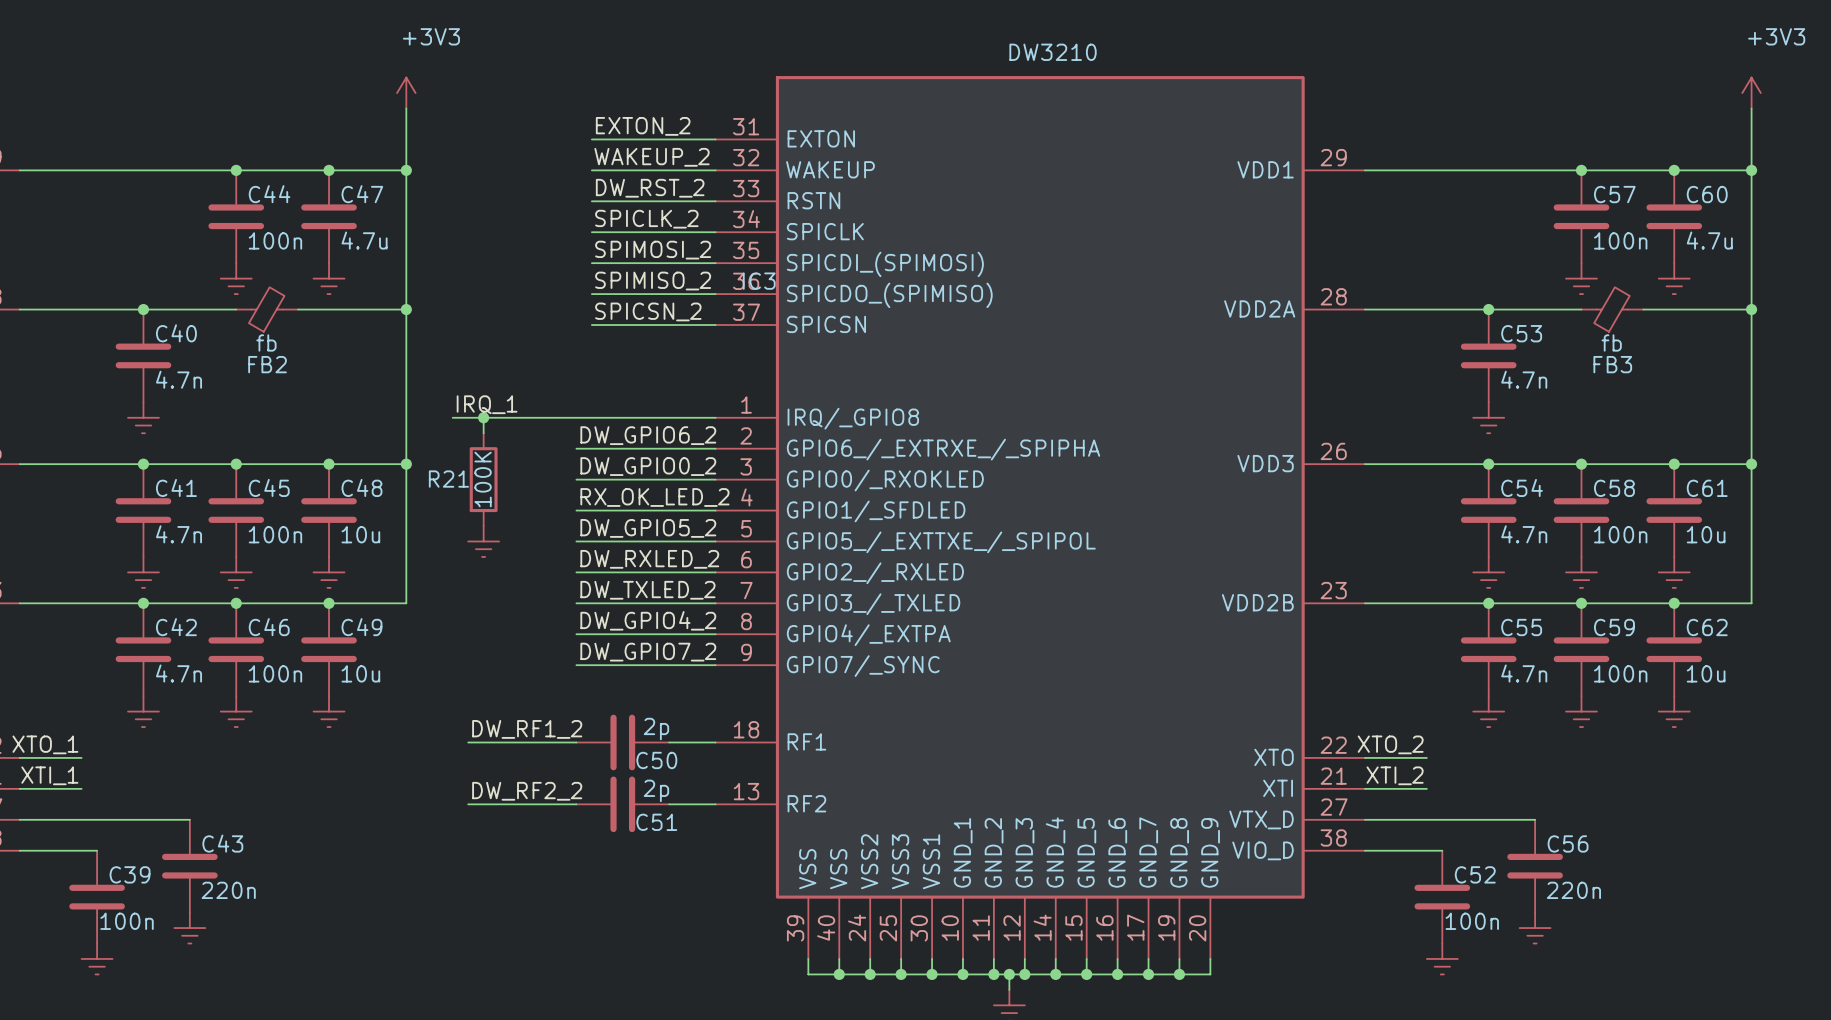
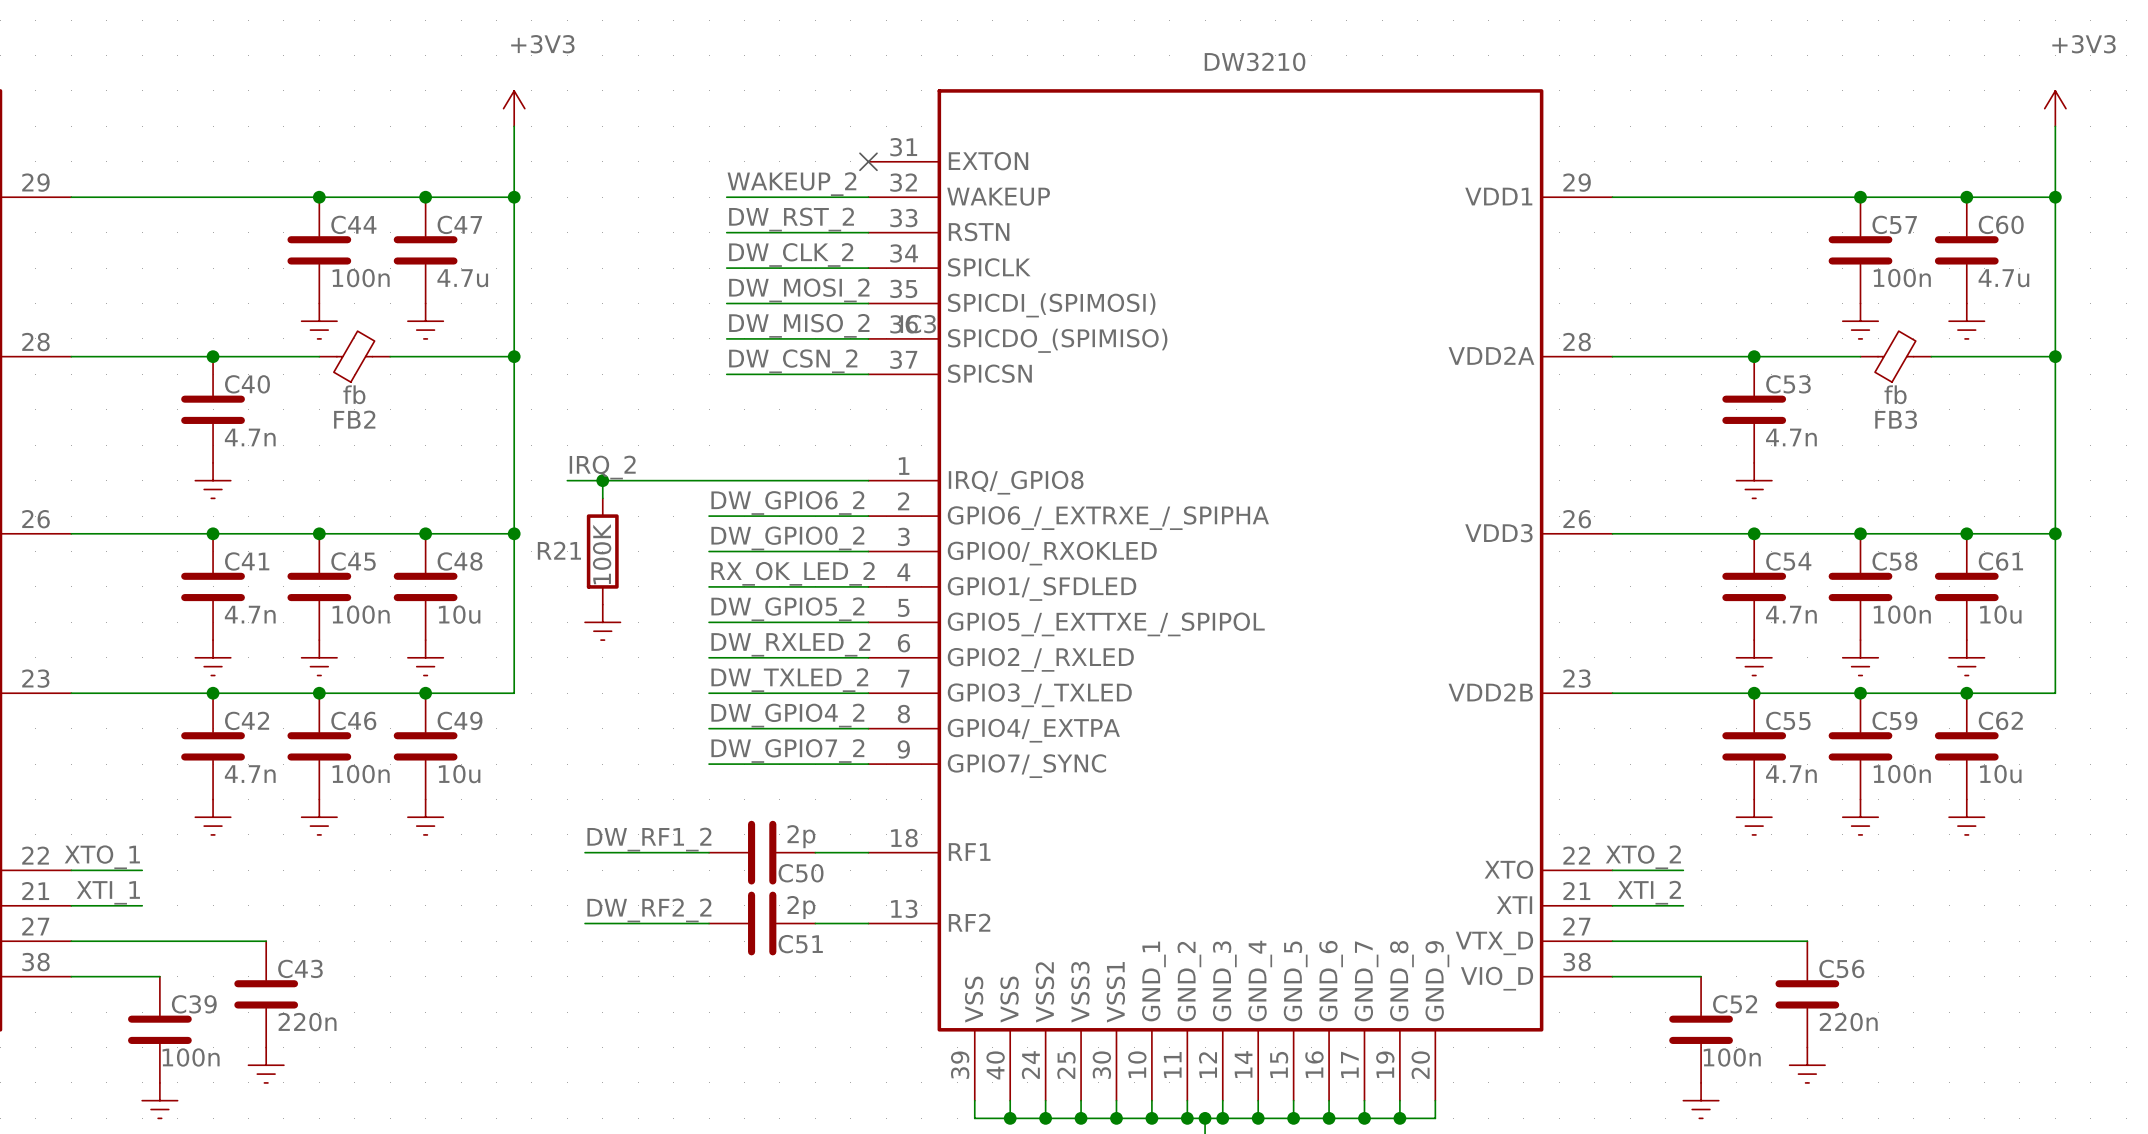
label: EXTON_2 (643, 126) -> none
wire: (591, 139) (715, 139) -> none
no-connect mark: none -> (868, 161)
label: SPICLK_2 (646, 219) -> DW_CLK_2 (791, 254)
label: SPIMOSI_2 (653, 250) -> DW_MOSI_2 (799, 290)
label: SPIMISO_2 (653, 281) -> DW_MISO_2 (799, 325)
label: SPICSN_2 (648, 311) -> DW_CSN_2 (793, 361)
label: IRQ_1 (487, 404) -> IRQ_2 (602, 467)

